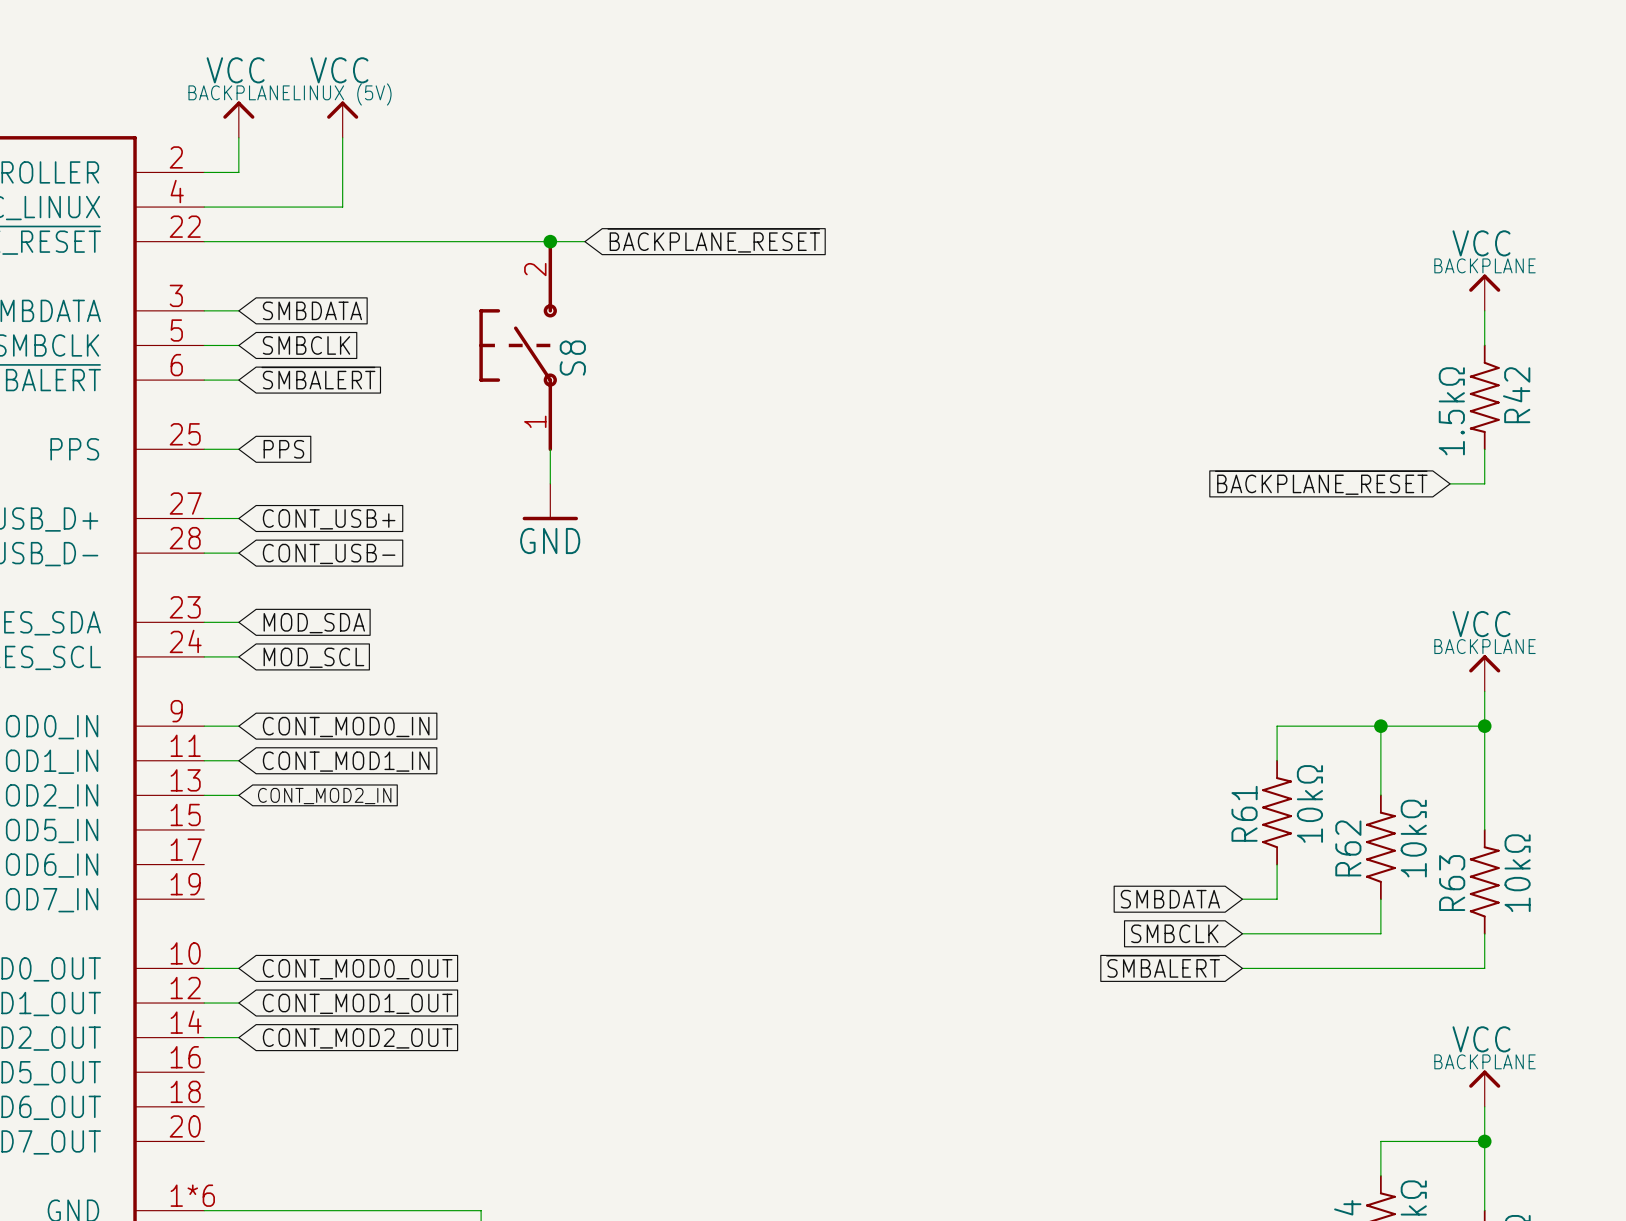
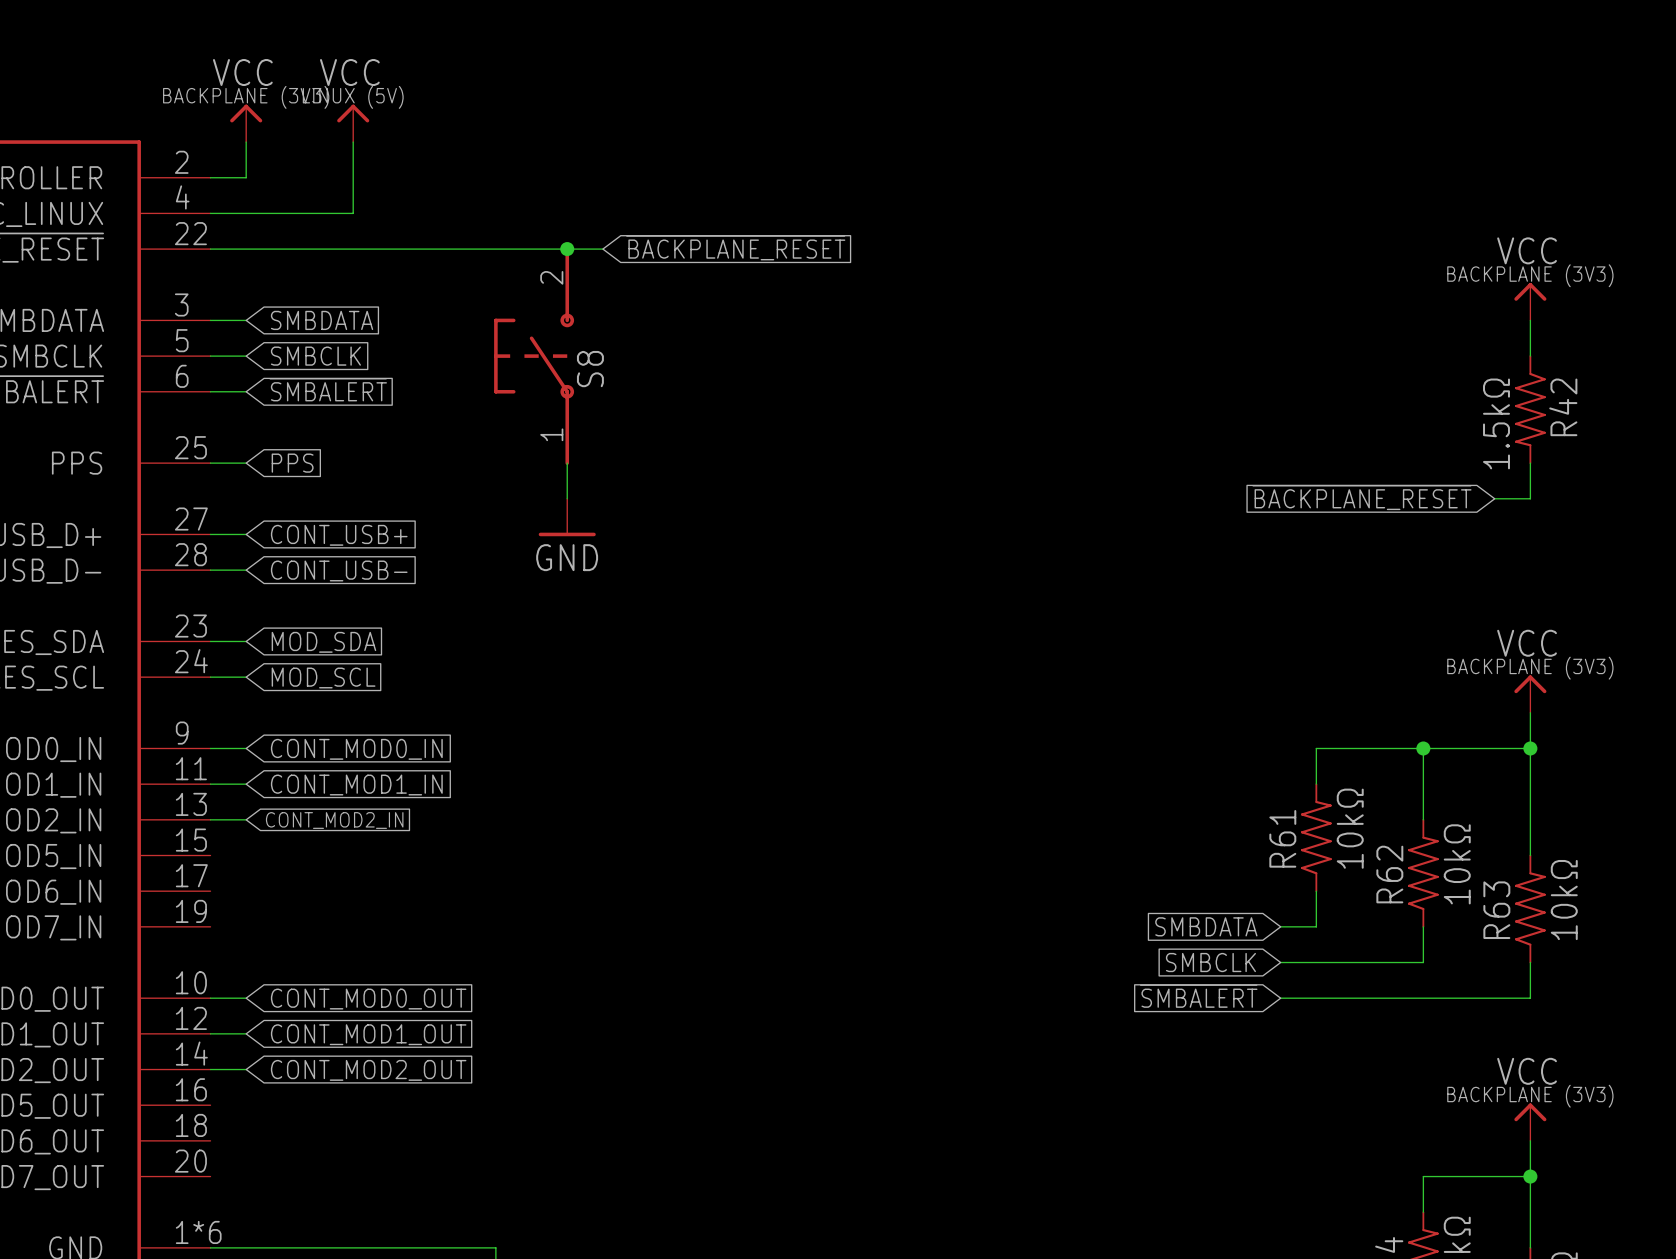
power symbol text: BACKPLANE (239, 92) -> BACKPLANE (3V3) (246, 97)
power symbol text: BACKPLANE (1485, 265) -> BACKPLANE (3V3) (1530, 275)
power symbol text: BACKPLANE (1485, 646) -> BACKPLANE (3V3) (1530, 668)
power symbol text: BACKPLANE (1485, 1061) -> BACKPLANE (3V3) (1530, 1096)

